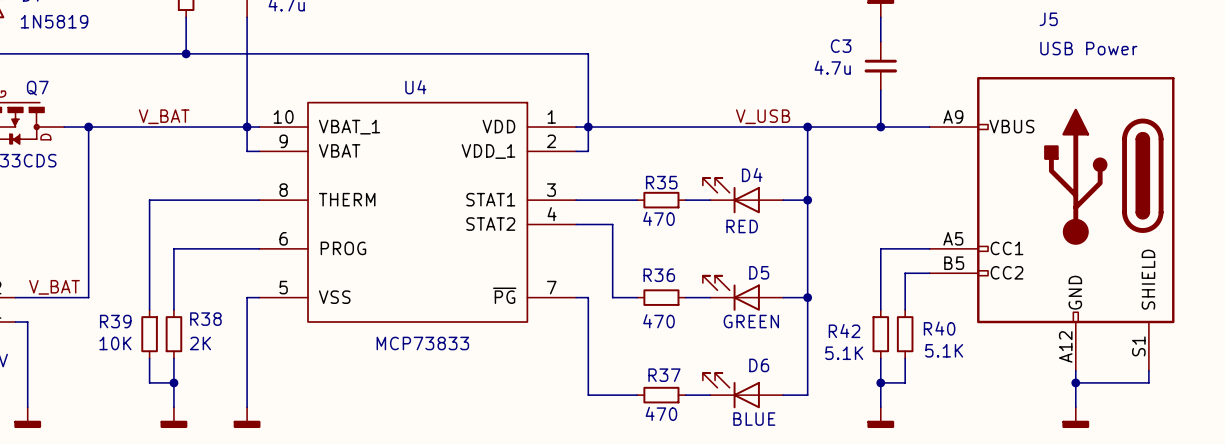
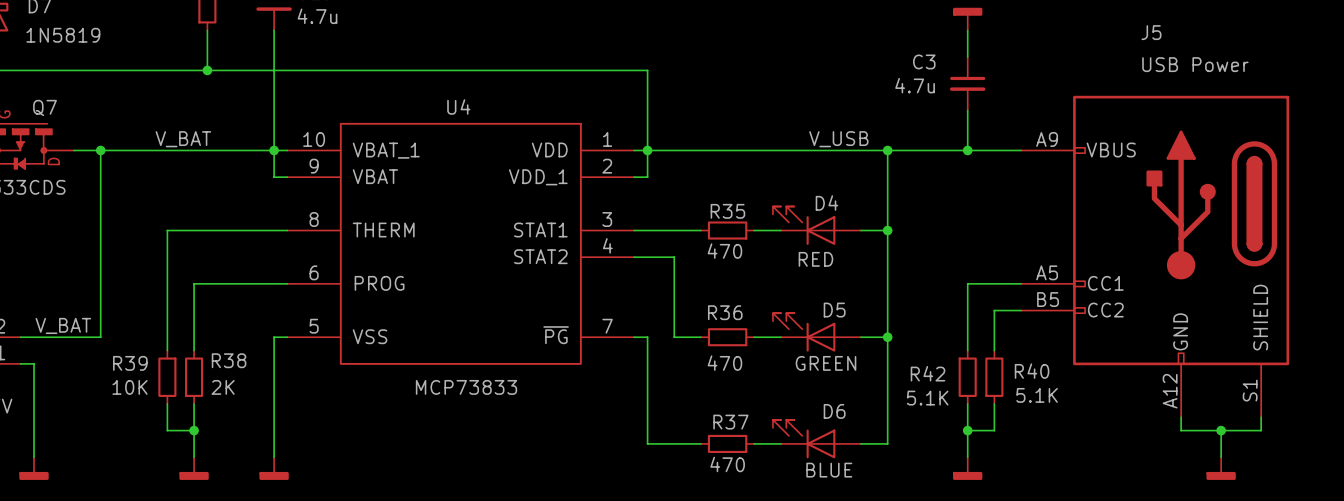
wire: (1075, 382) (1075, 407) -> (1221, 430) (1221, 457)
junction position: (1075, 382) -> (1221, 430)
power symbol position: (1075, 417) -> (1221, 468)

